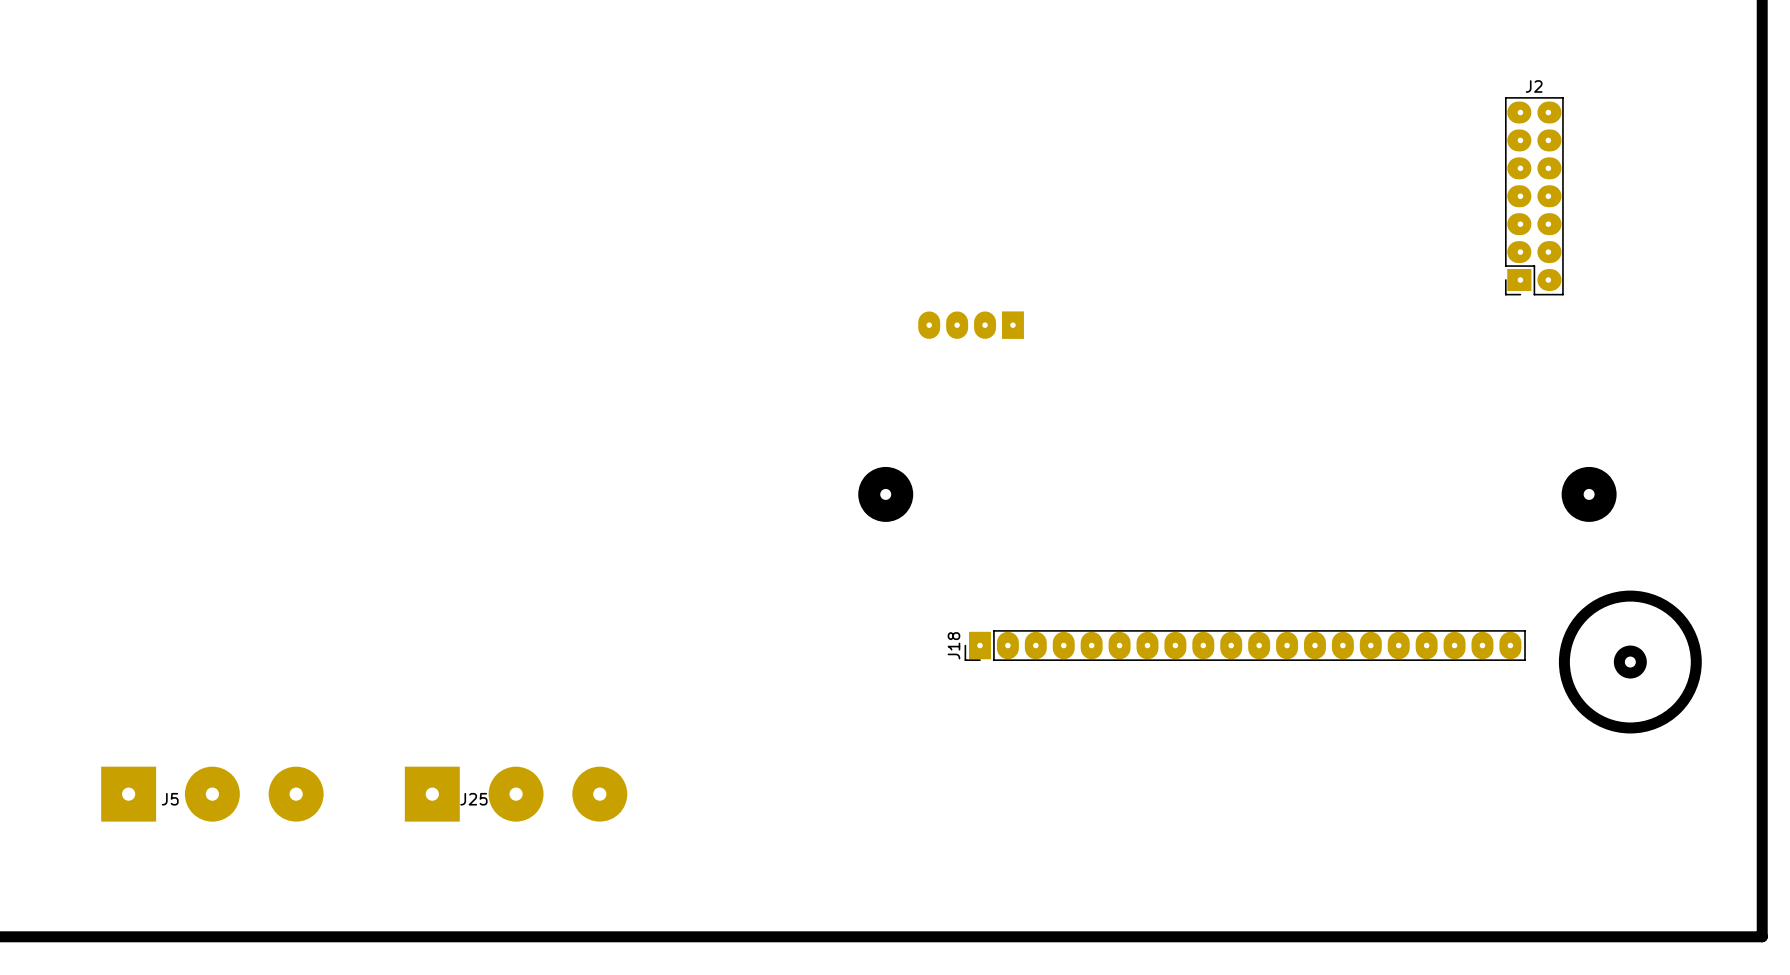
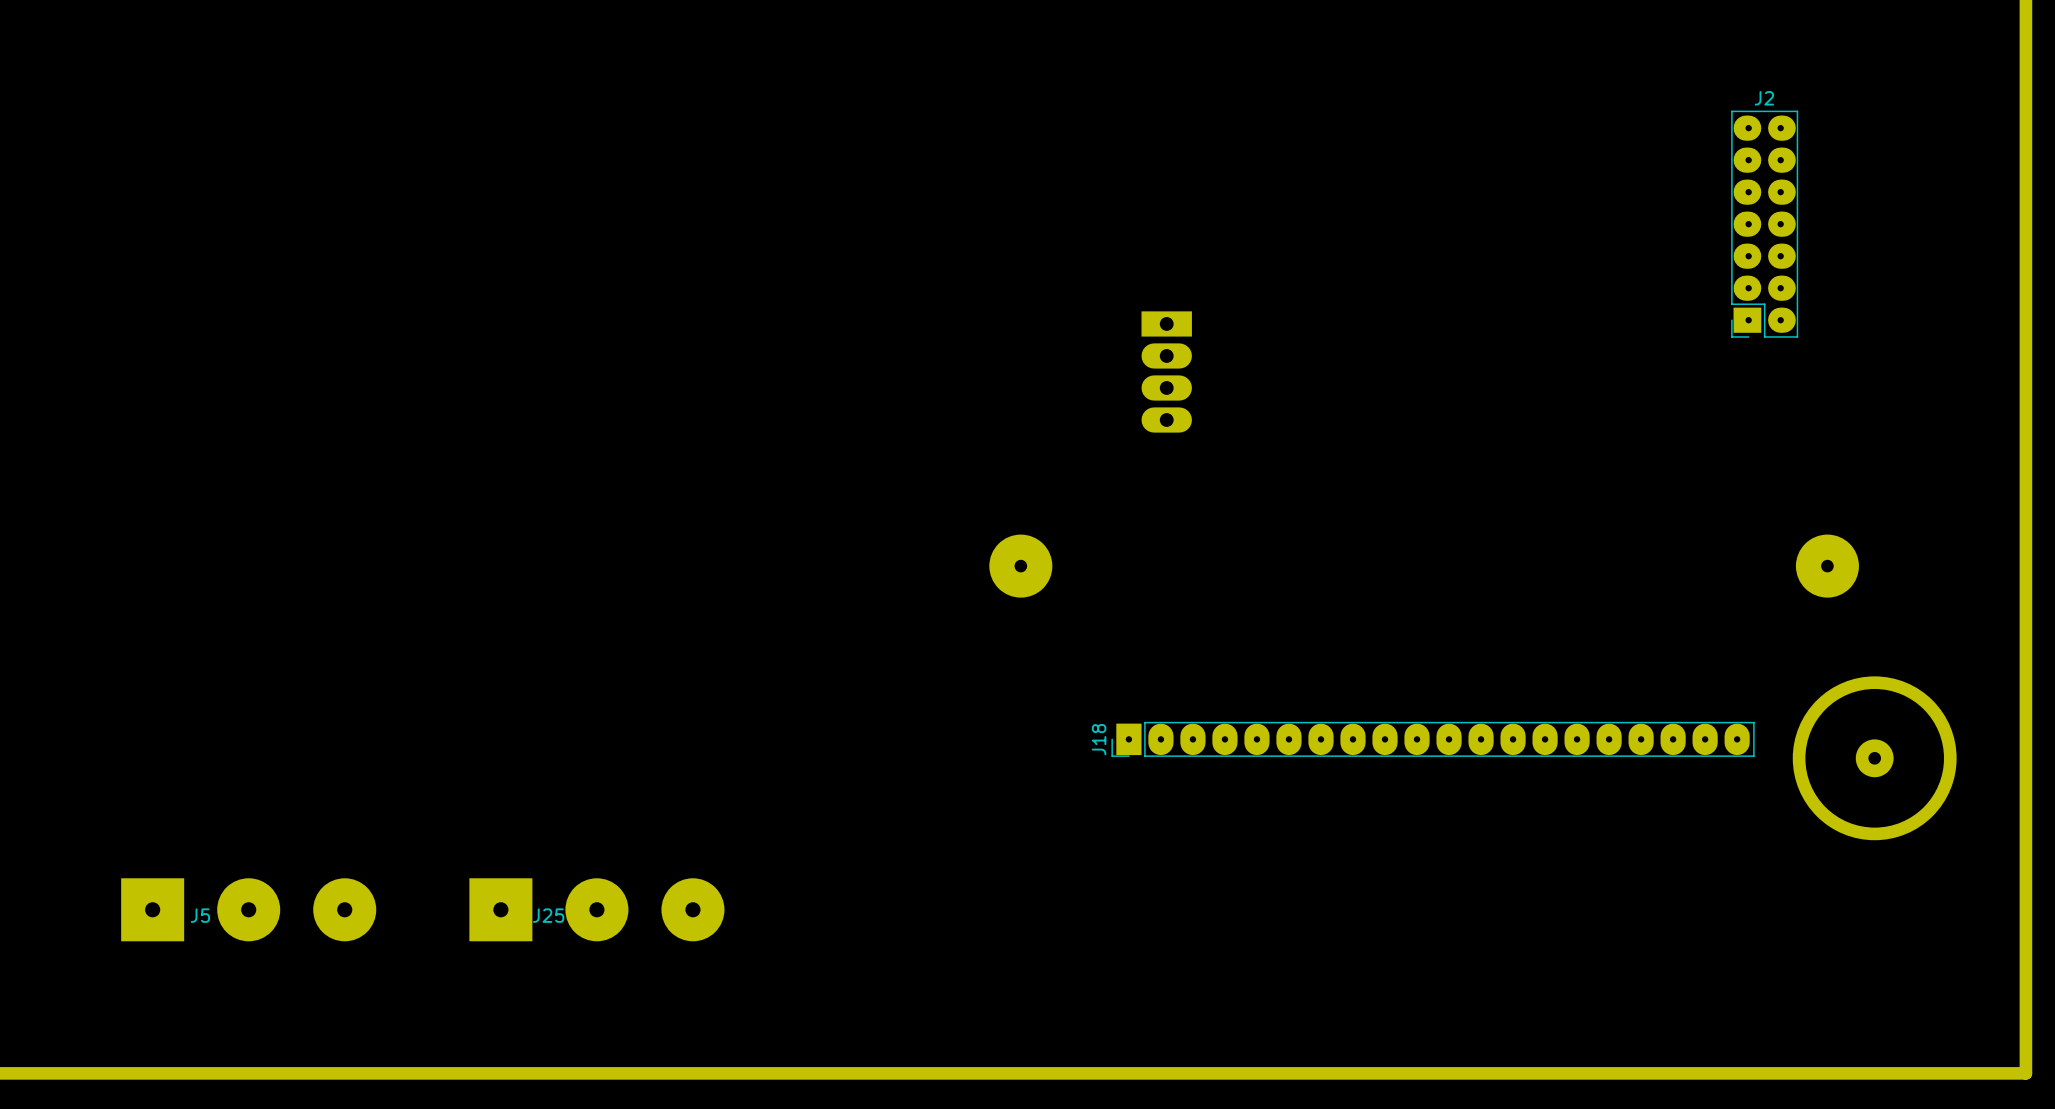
part: (971, 325) -> none
part: none -> (1166, 371)

